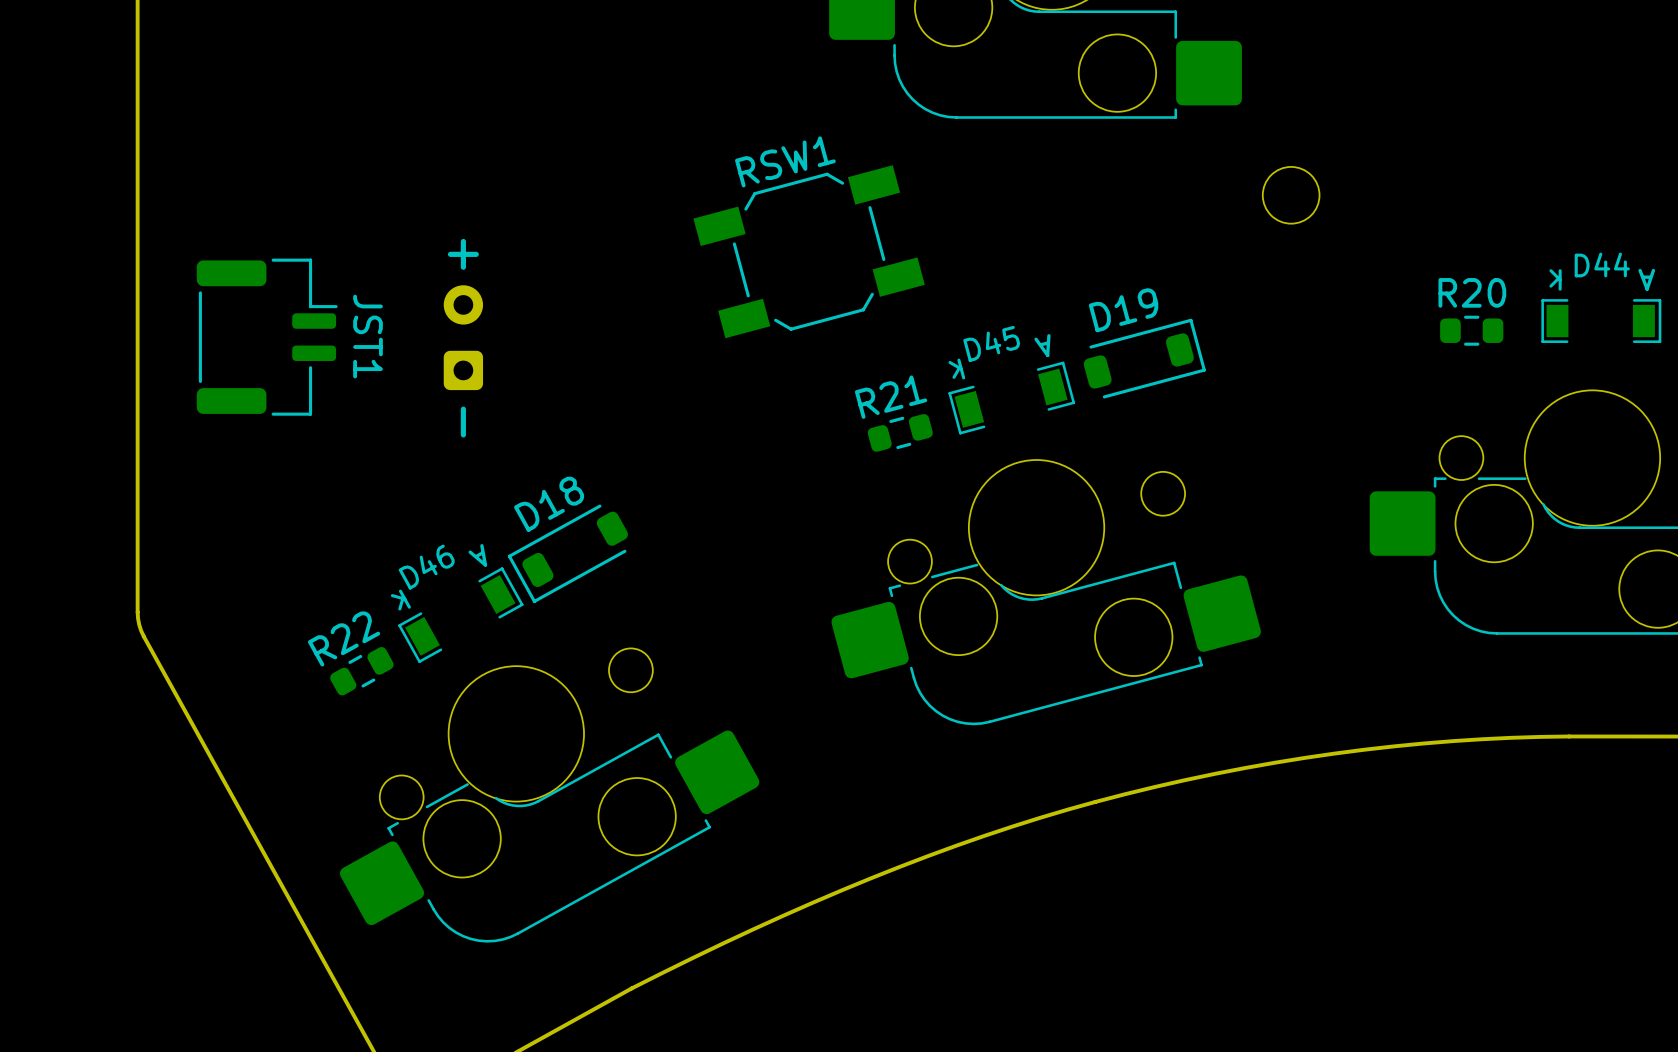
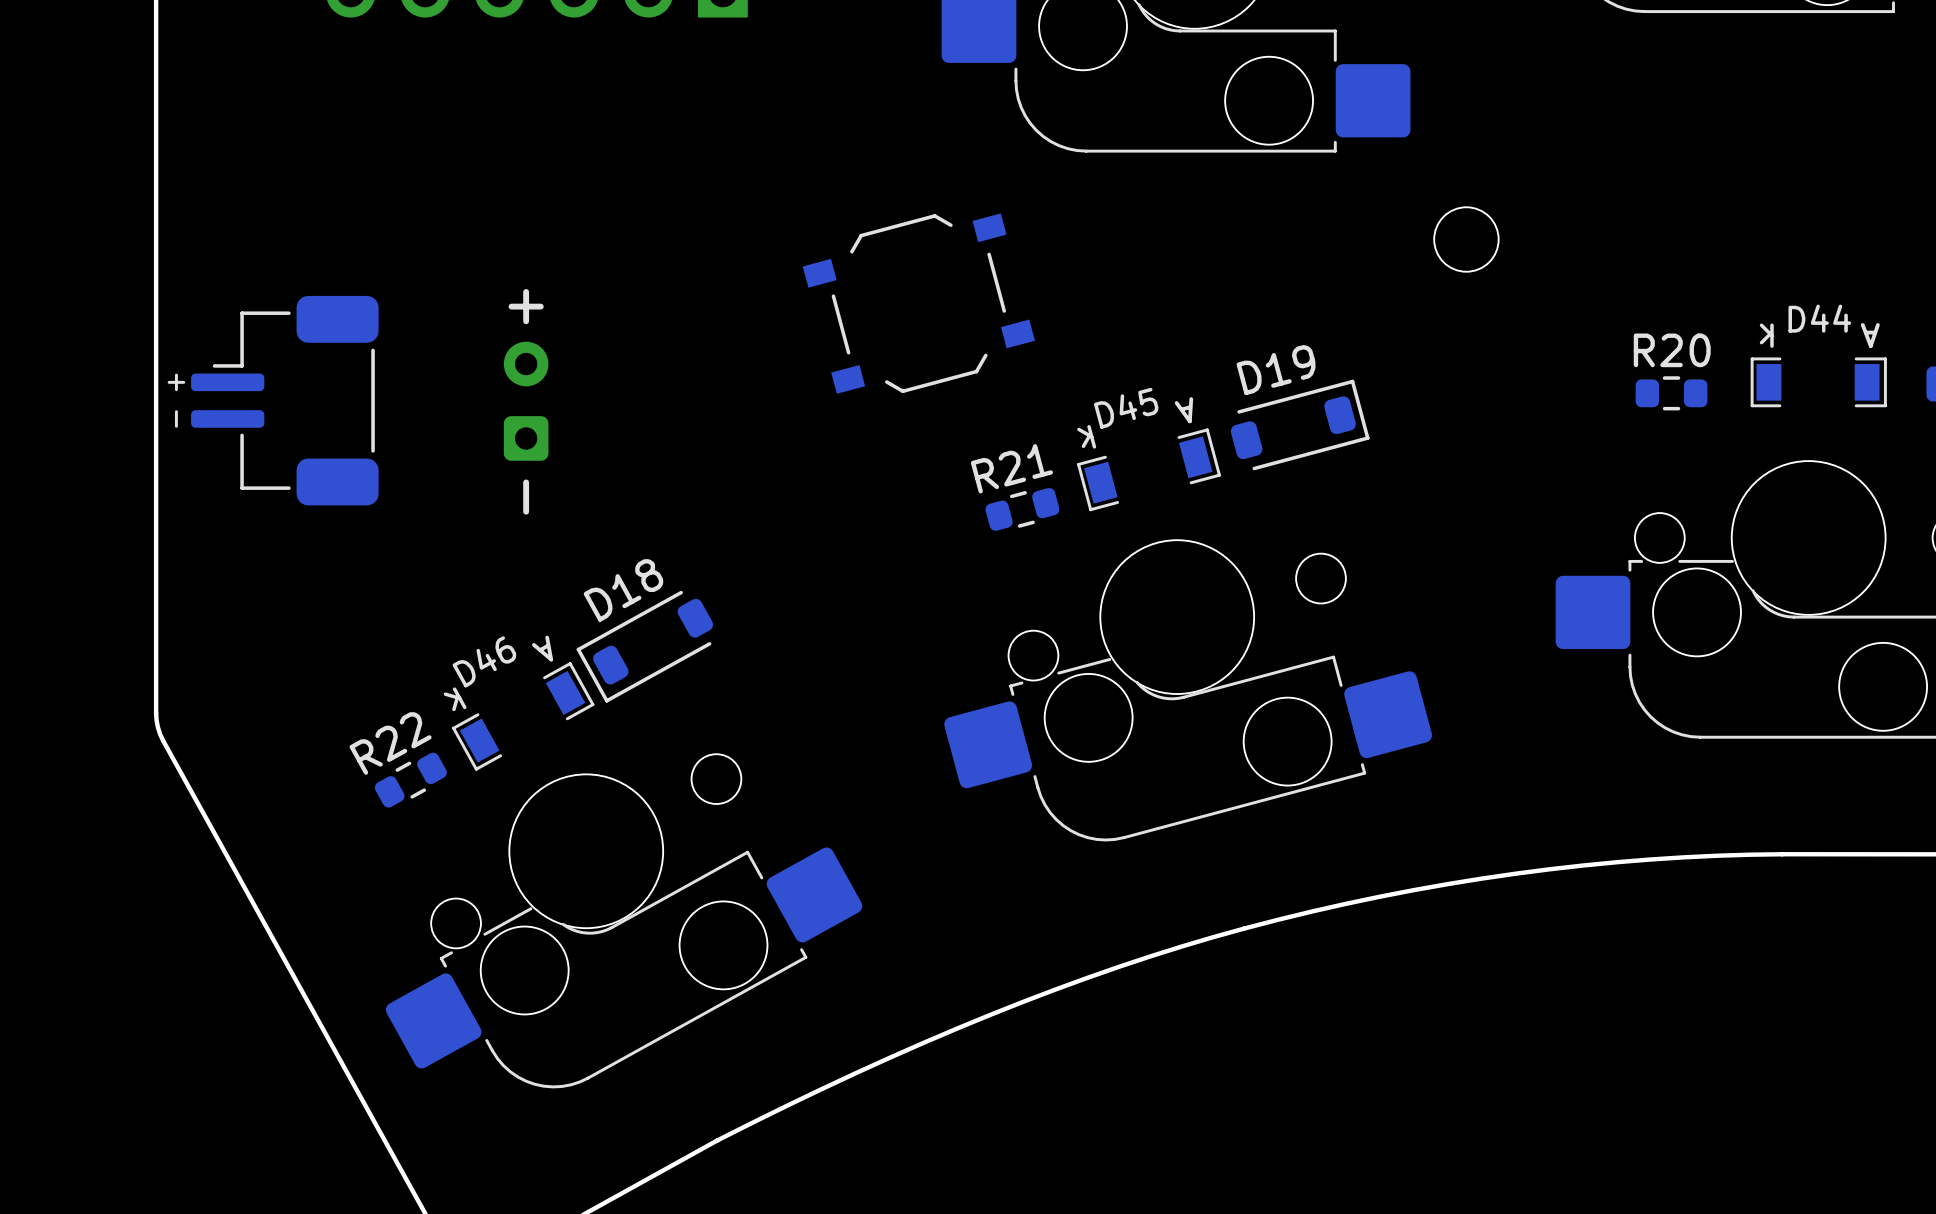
RSW1: (809, 251) -> none
part: none -> (918, 303)
part: none -> (273, 400)
JST1: (267, 337) -> none

